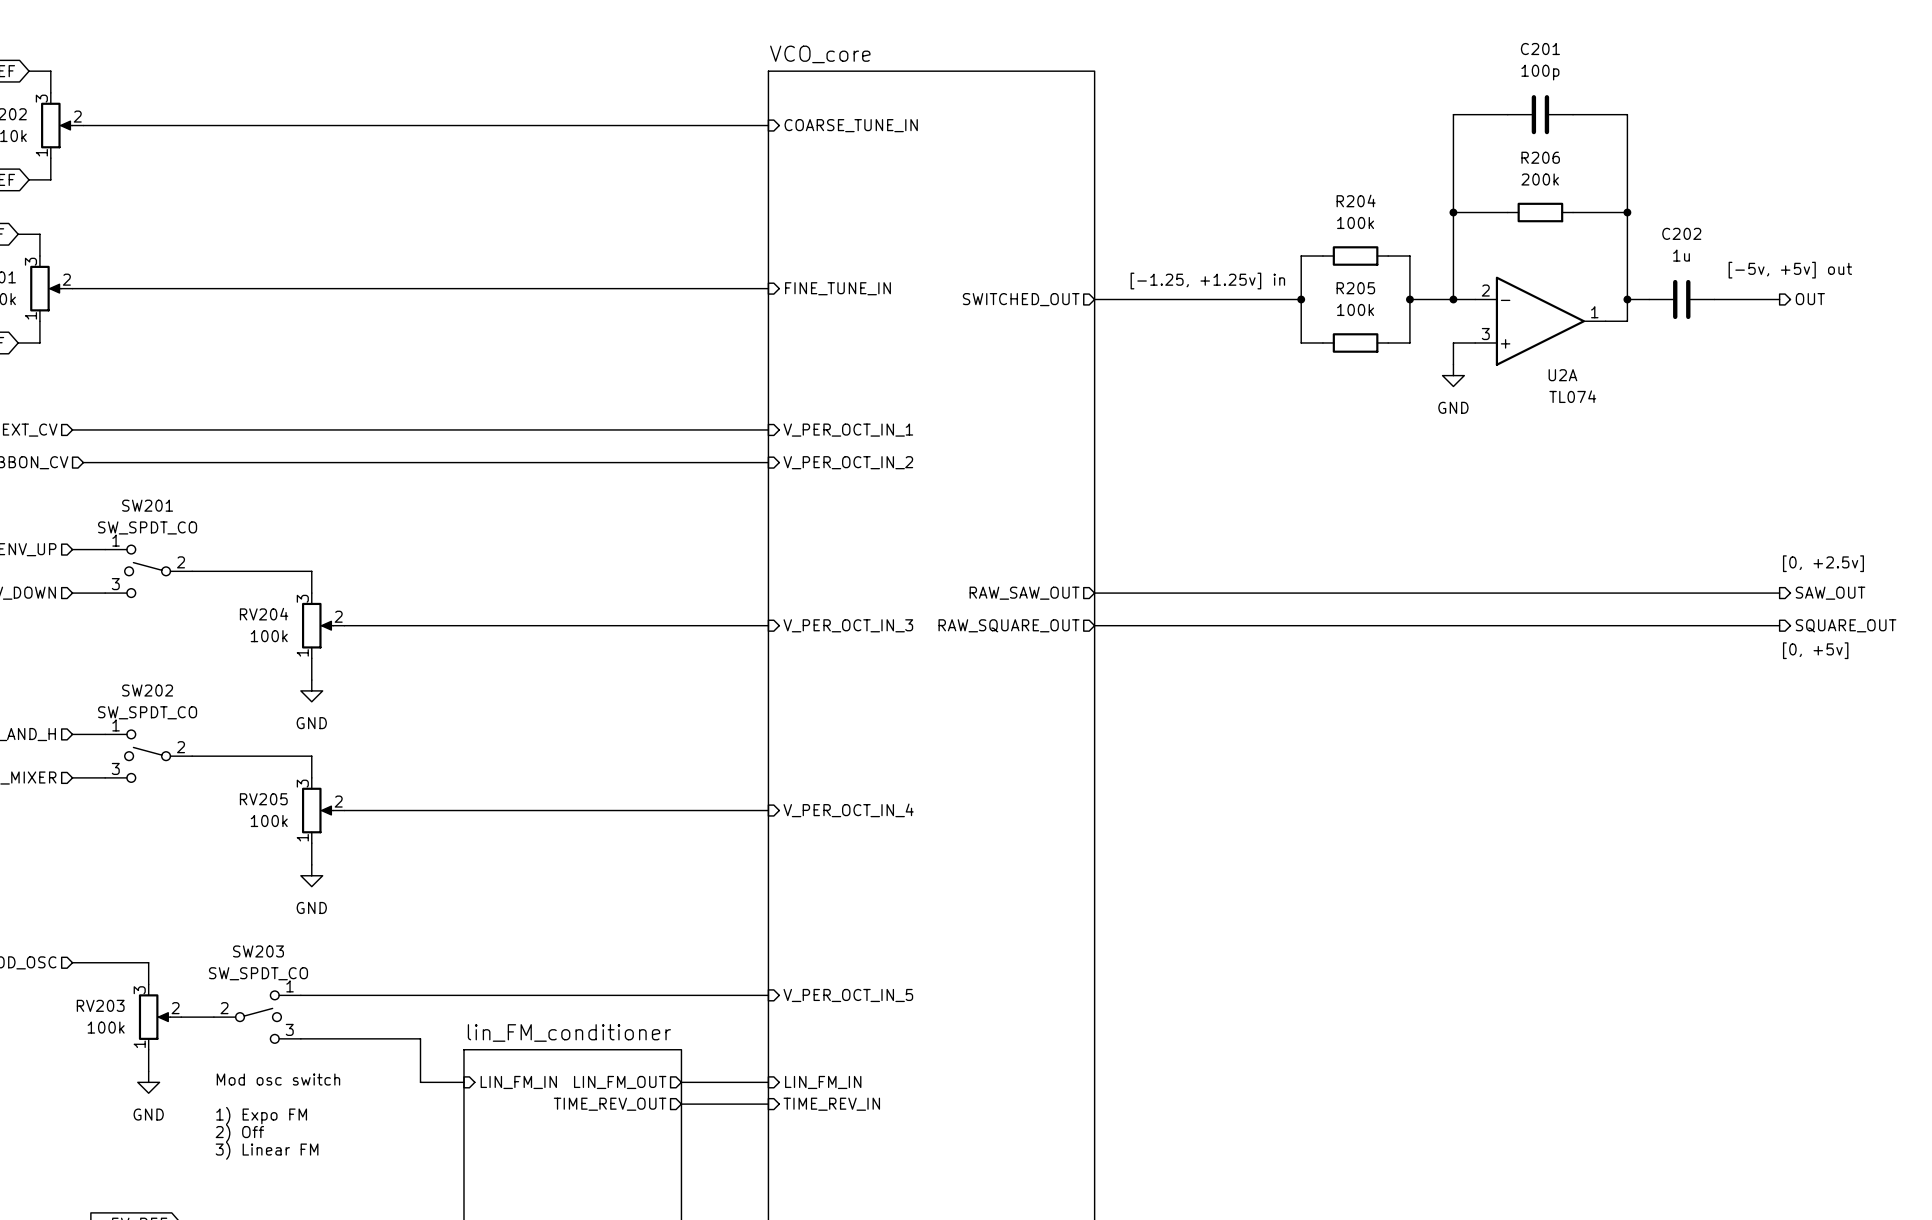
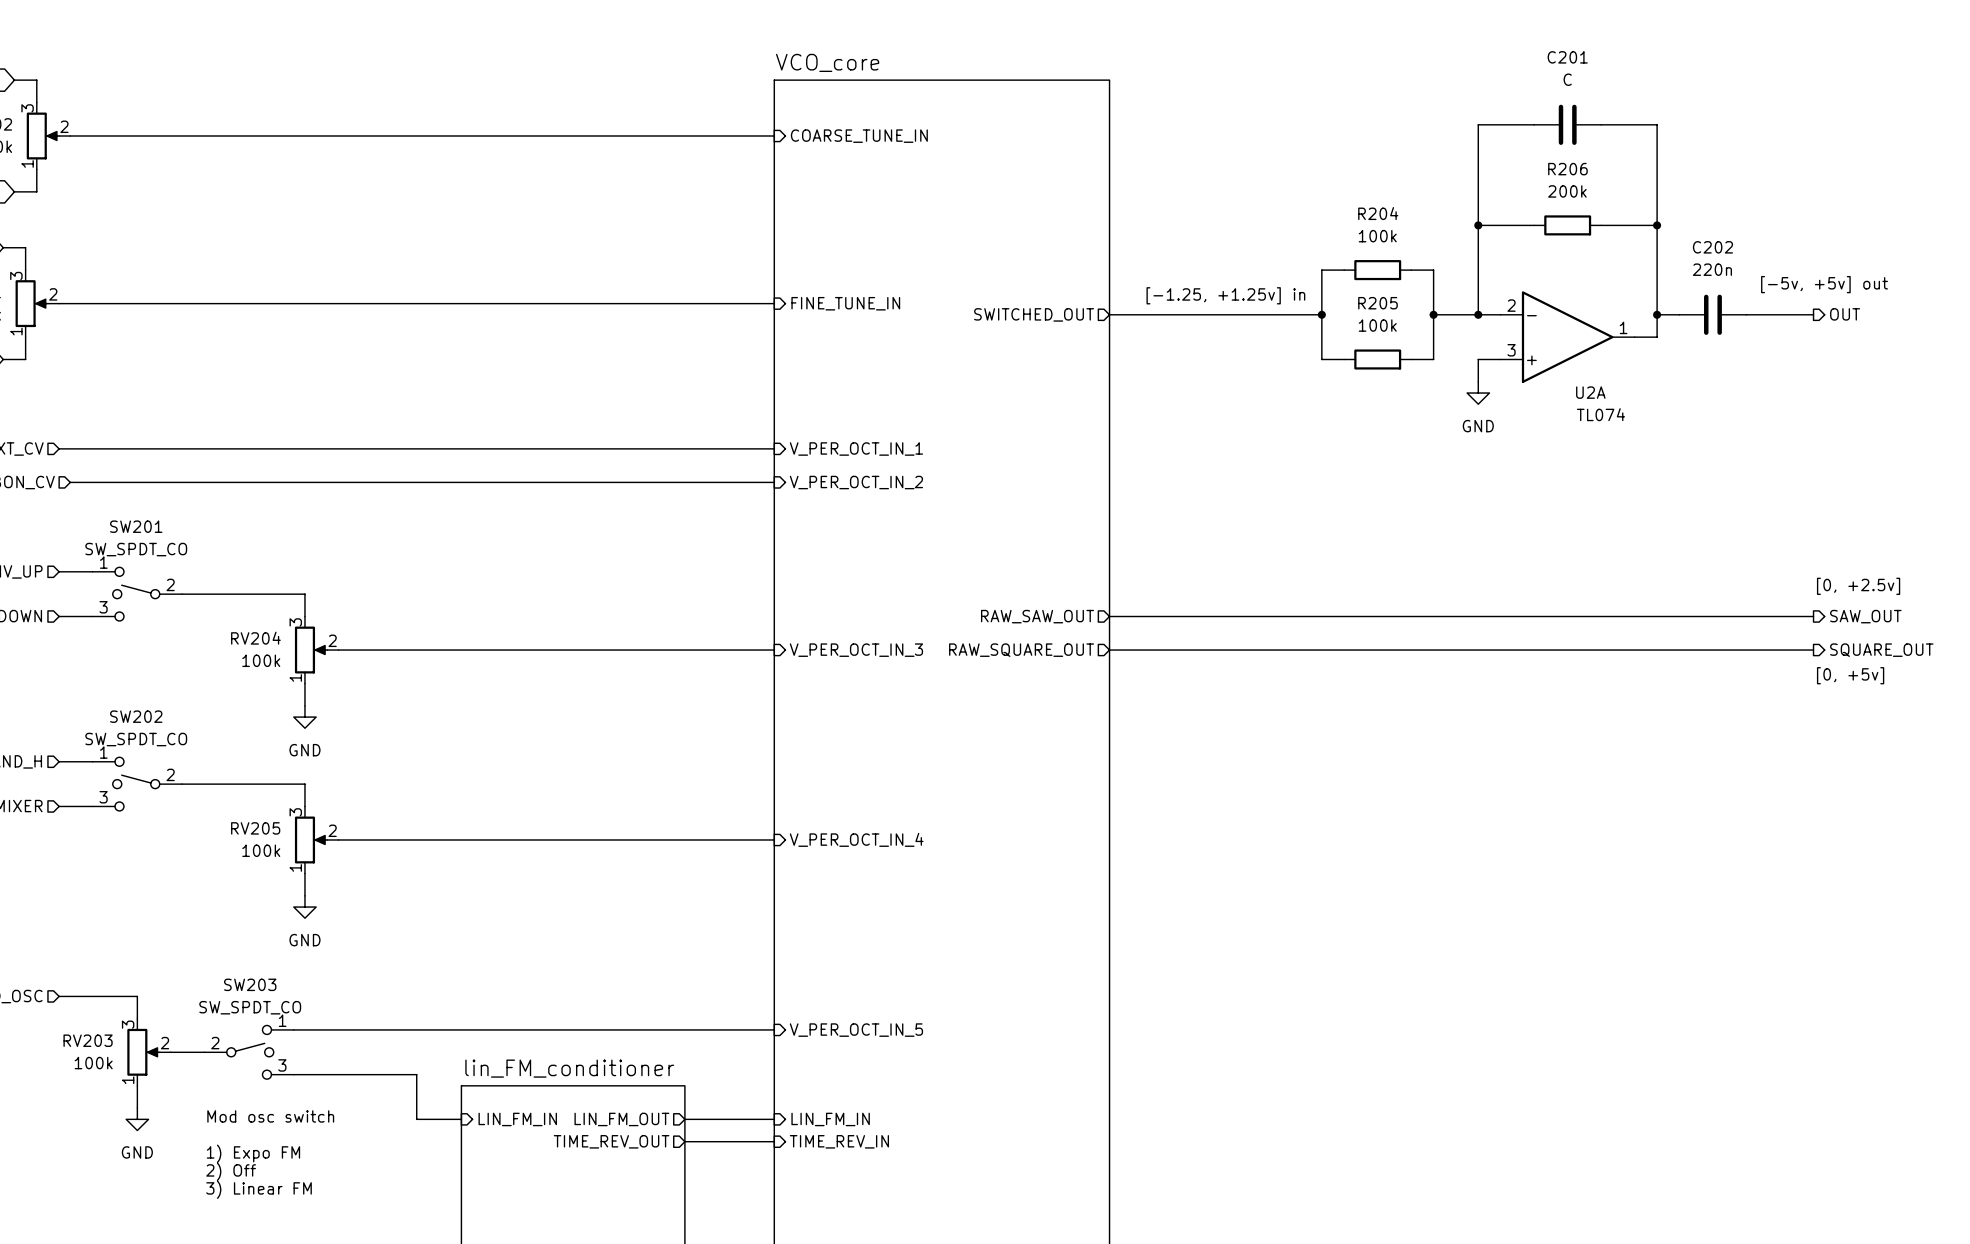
C201 value: 100p (1540, 72) -> C (1567, 79)
C202 value: 1u (1681, 255) -> 220n (1712, 269)

